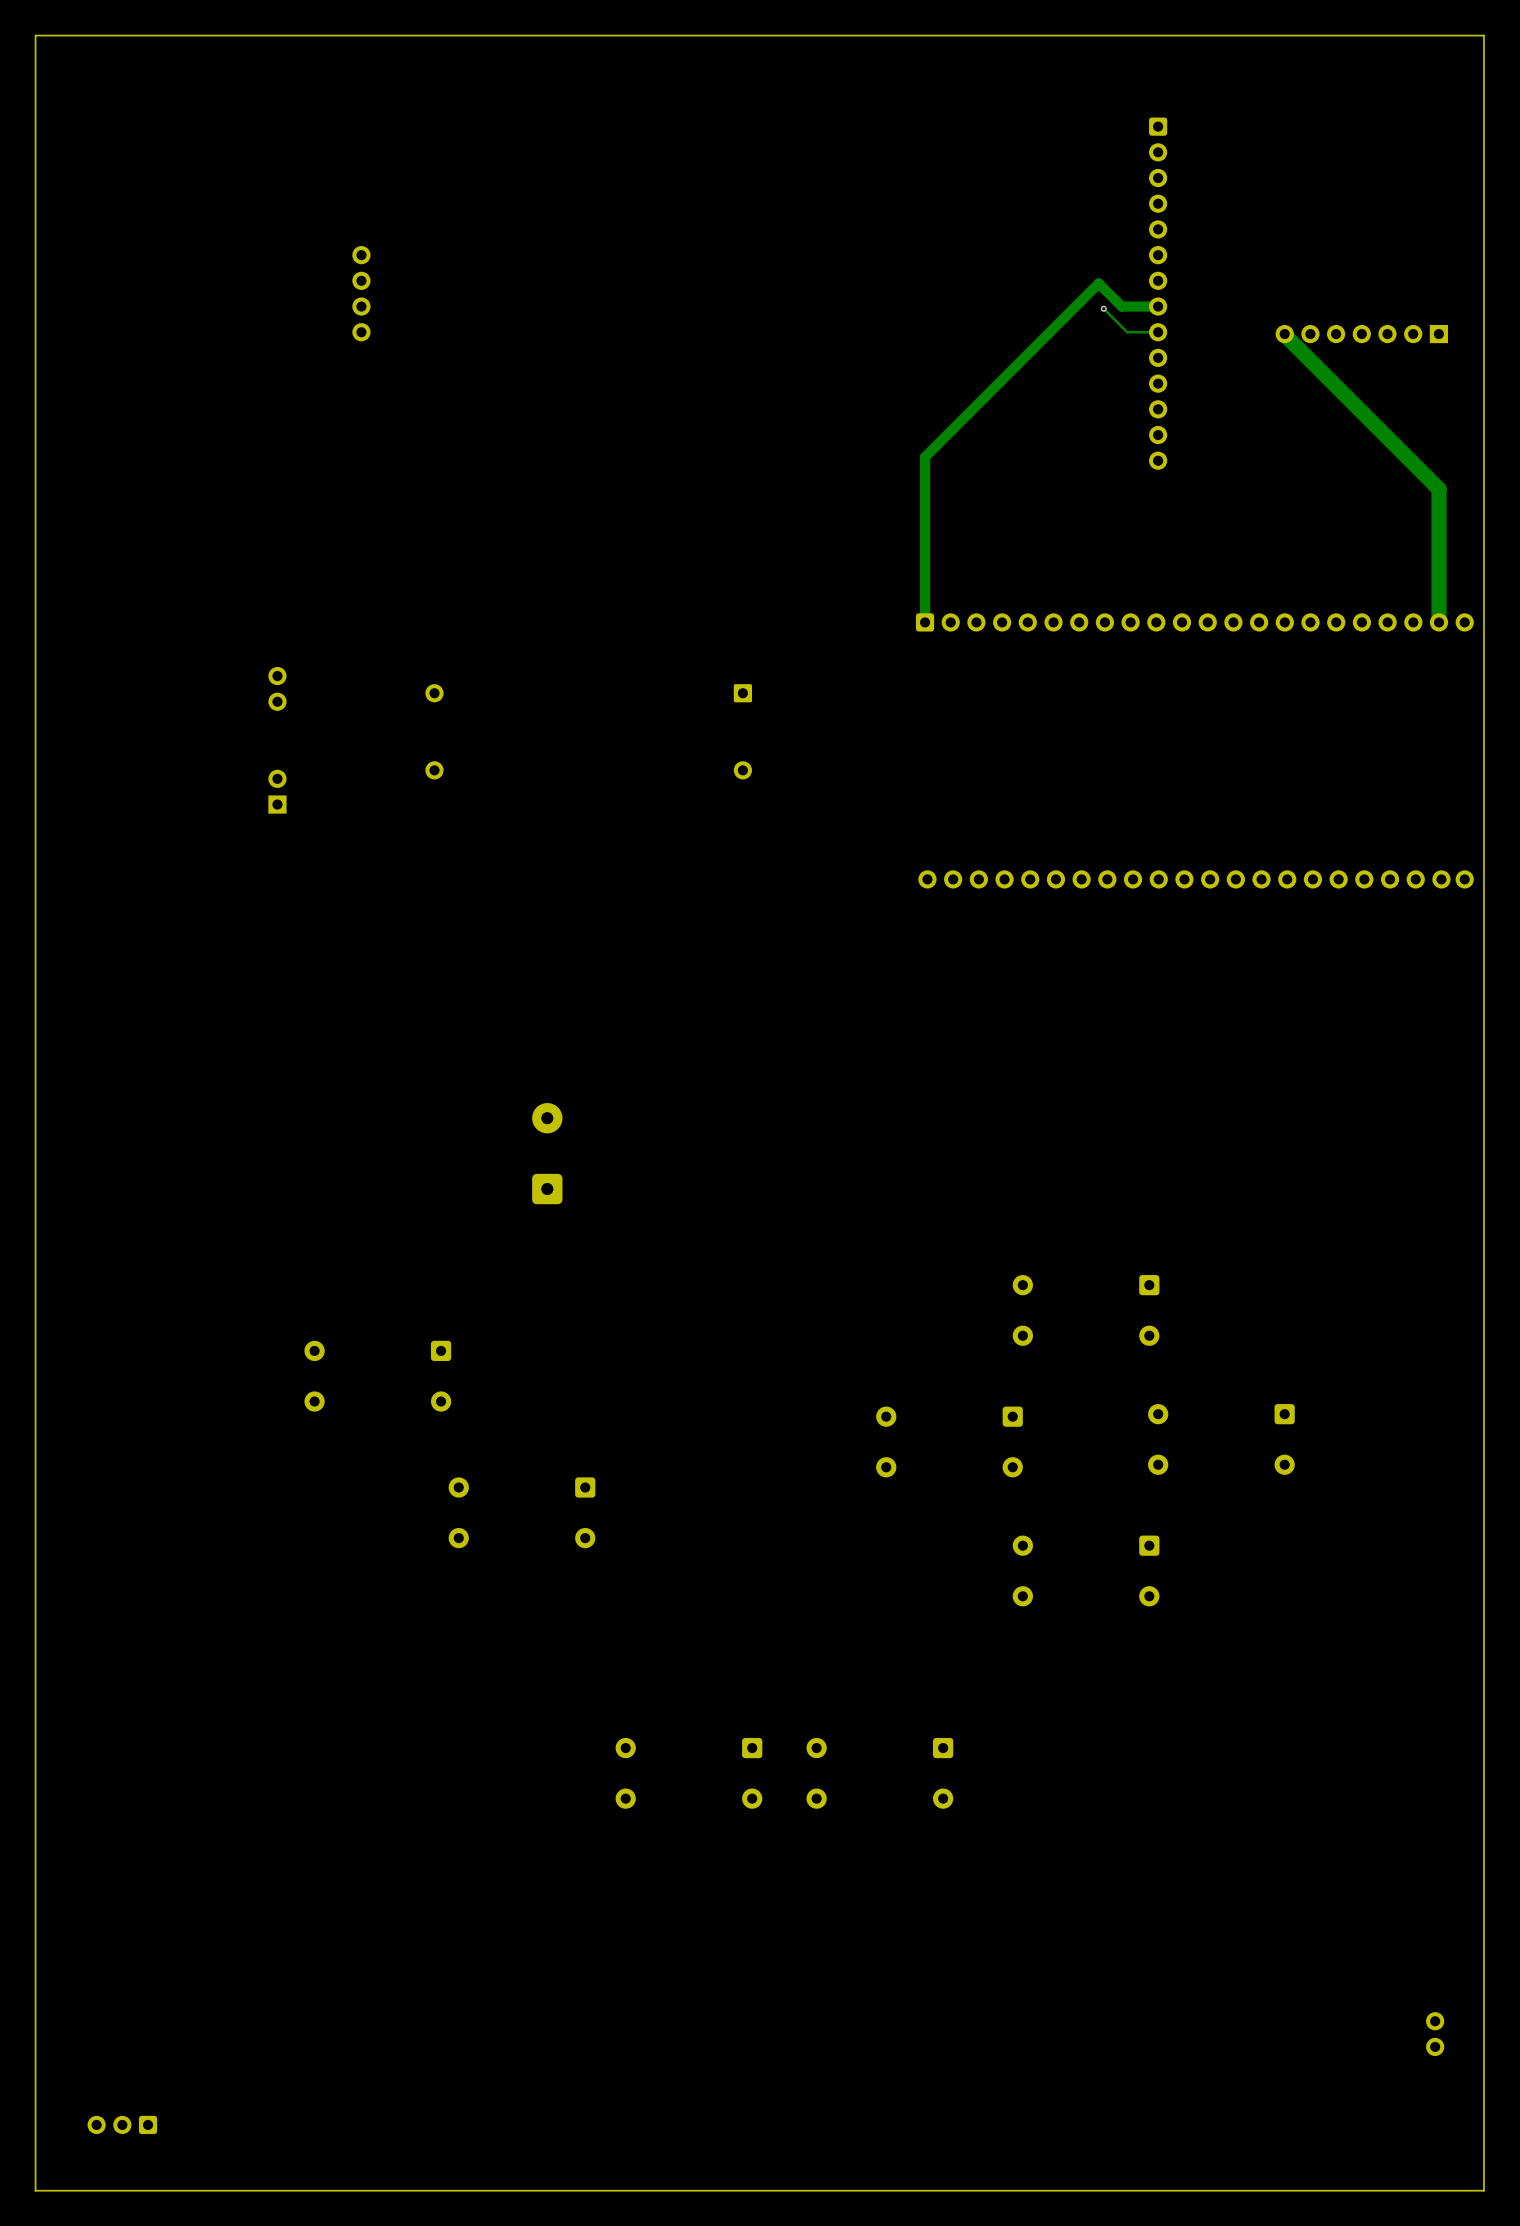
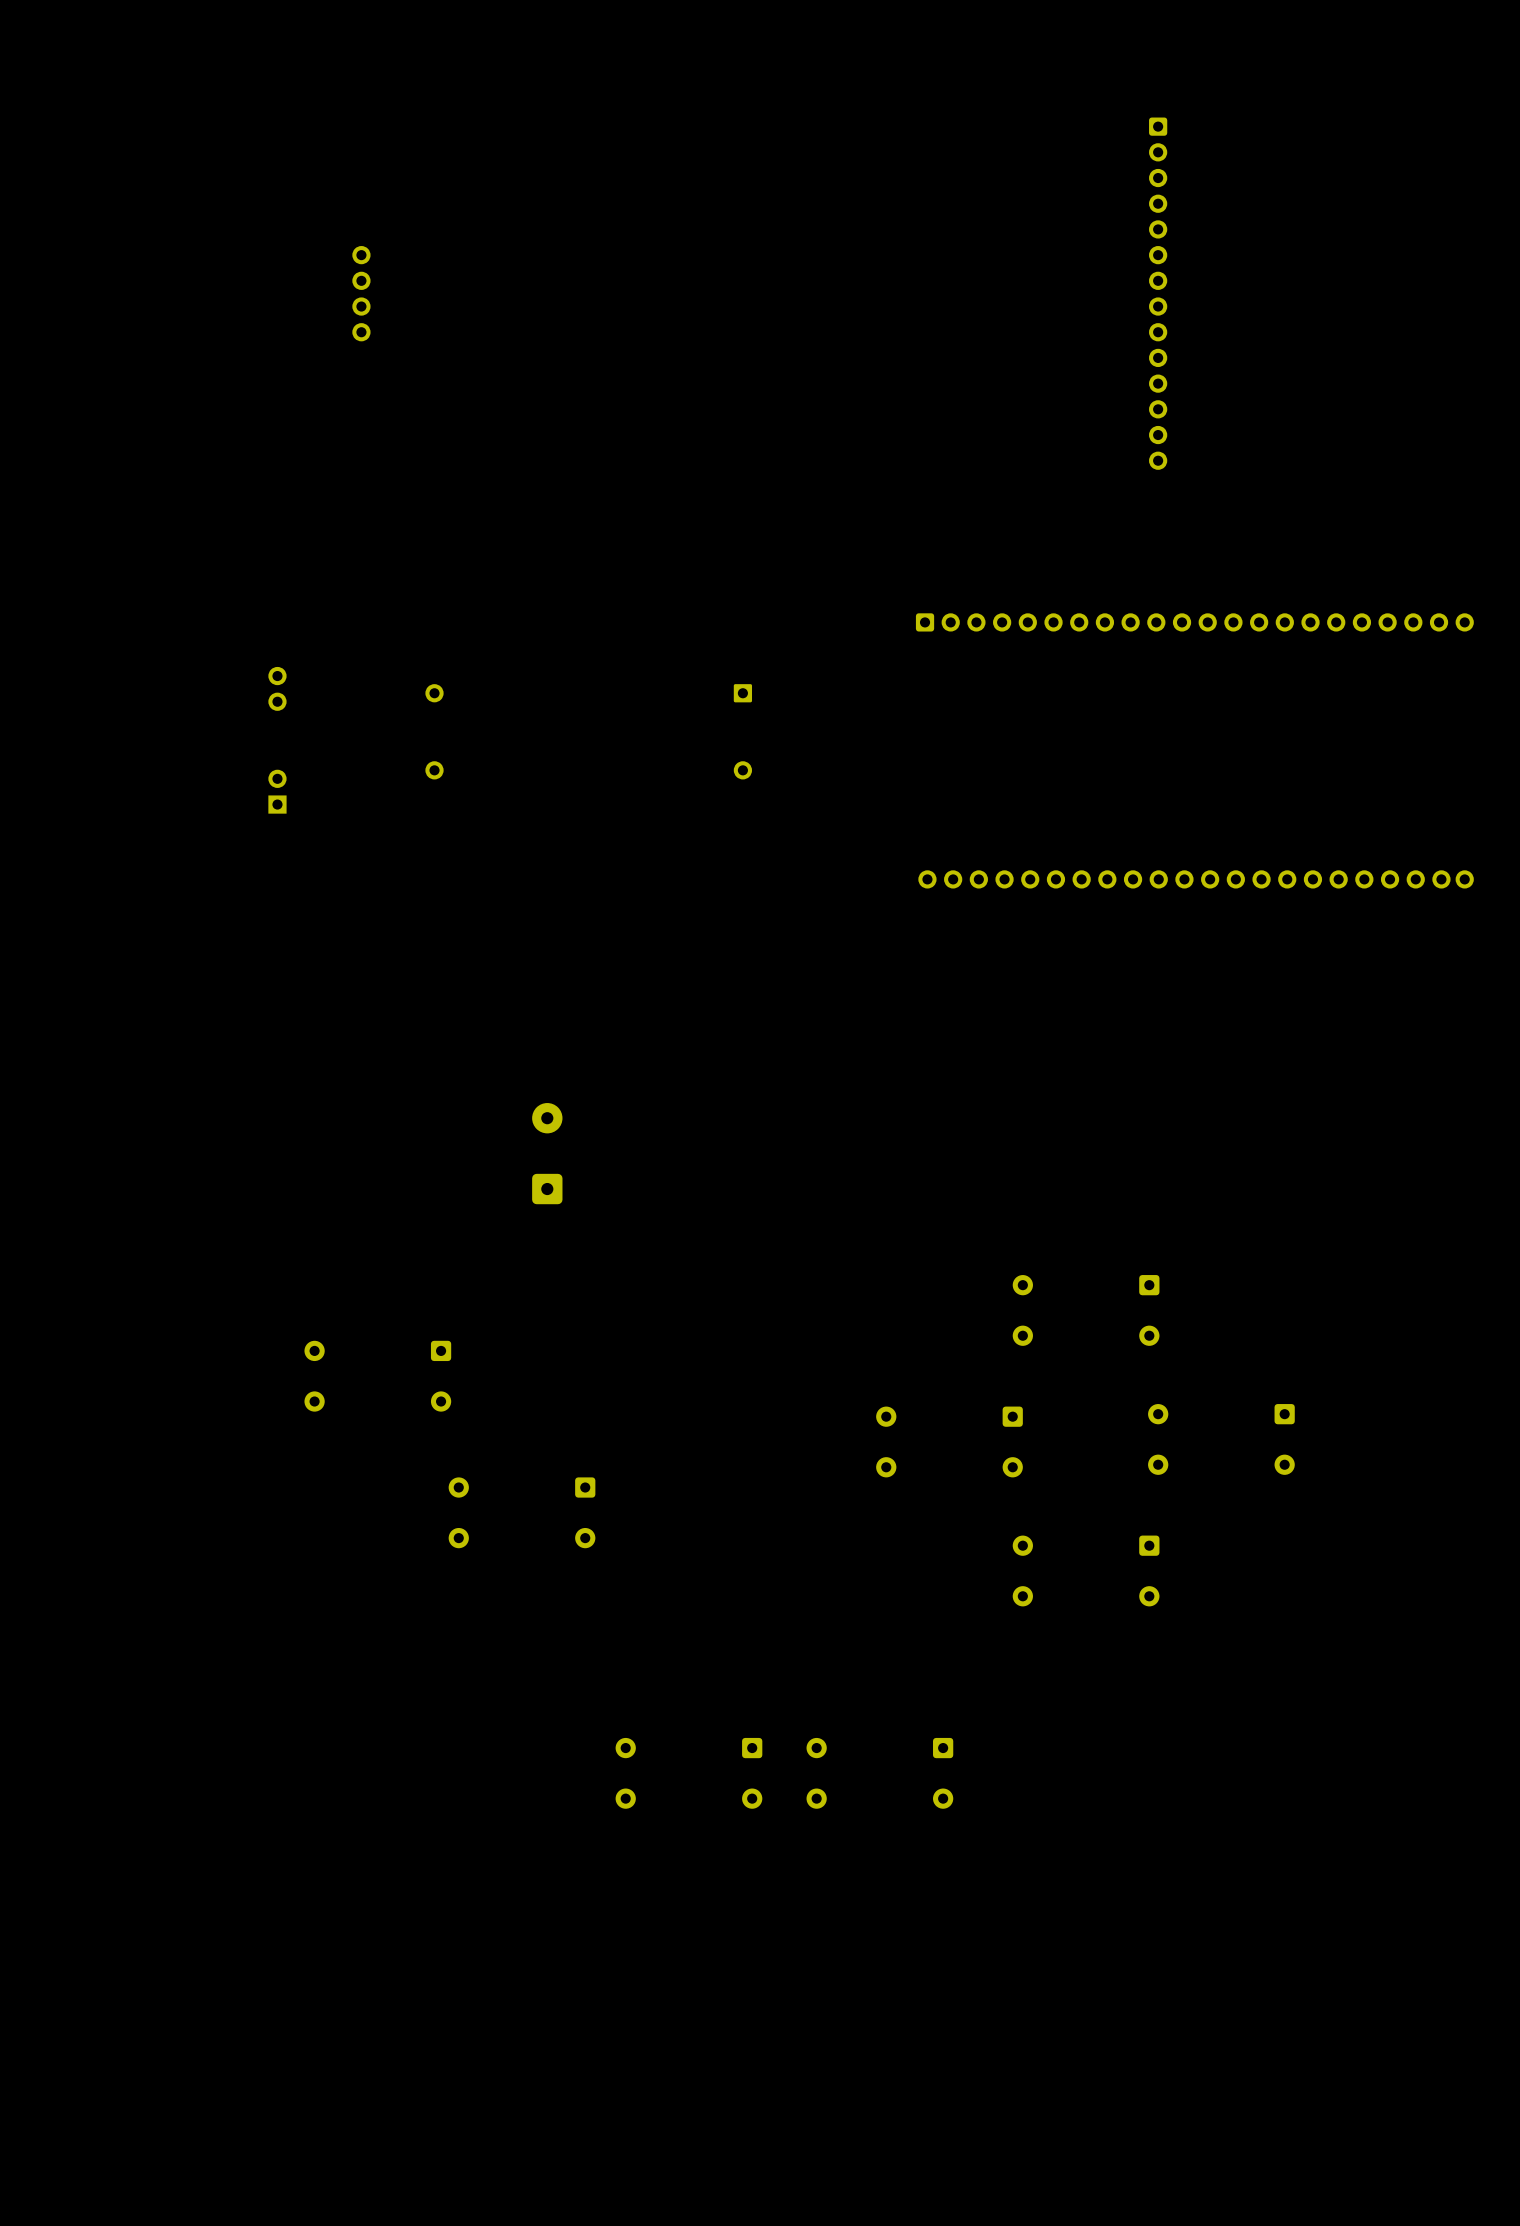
board edge: (1484, 35) (35, 35) (35, 2190) (1484, 2190) (1484, 35) -> none
track: (1158, 306) (1121, 306) (1098, 283) (925, 457) (925, 622) -> none
track: (1103, 308) (1127, 332) (1158, 332) -> none
via: (1103, 308) -> none
track: (1284, 334) (1439, 489) (1439, 622) -> none
part: (1361, 334) -> none
part: (1435, 2034) -> none
part: (122, 2124) -> none

